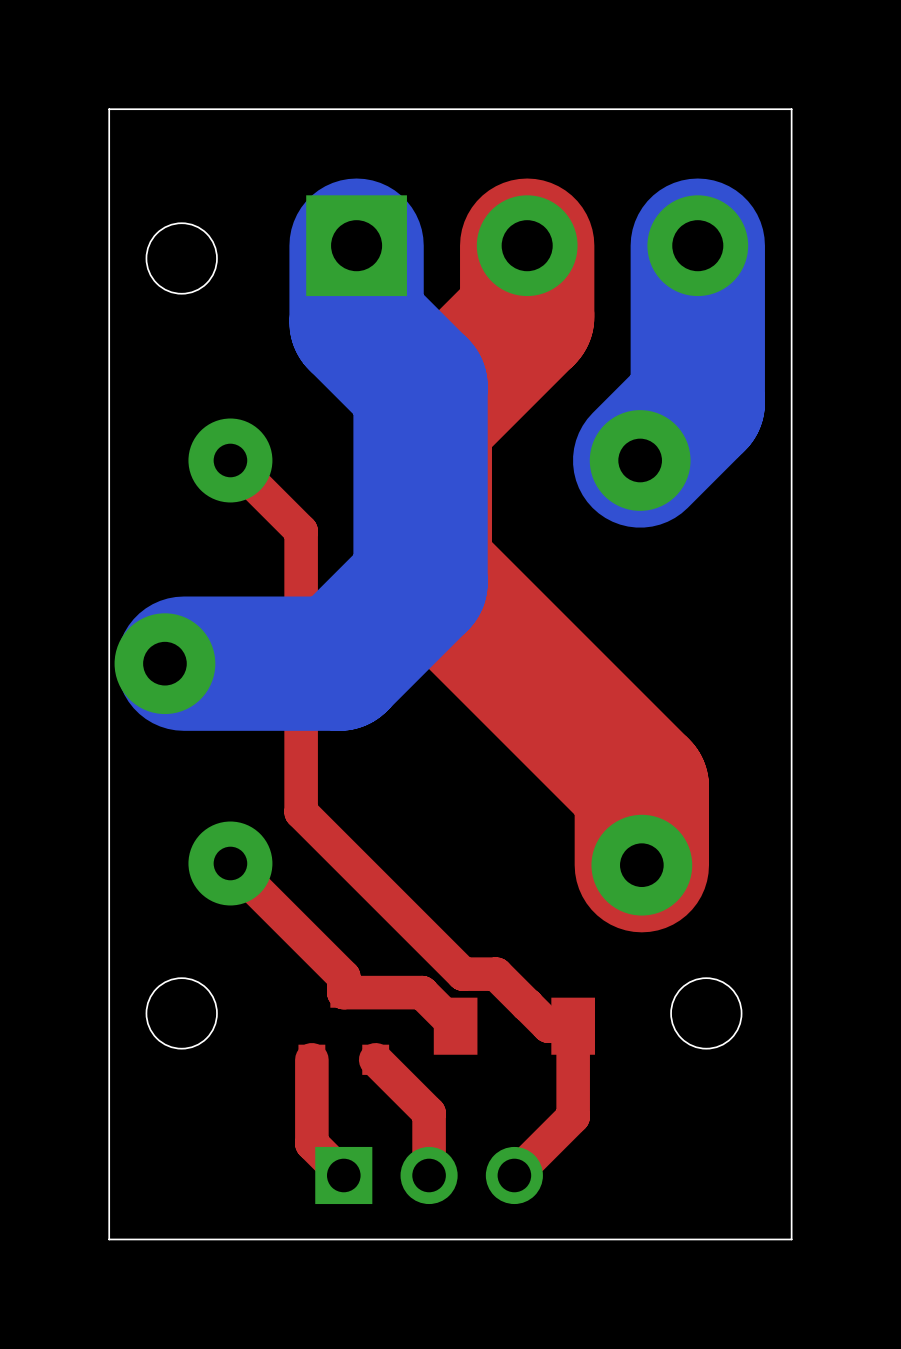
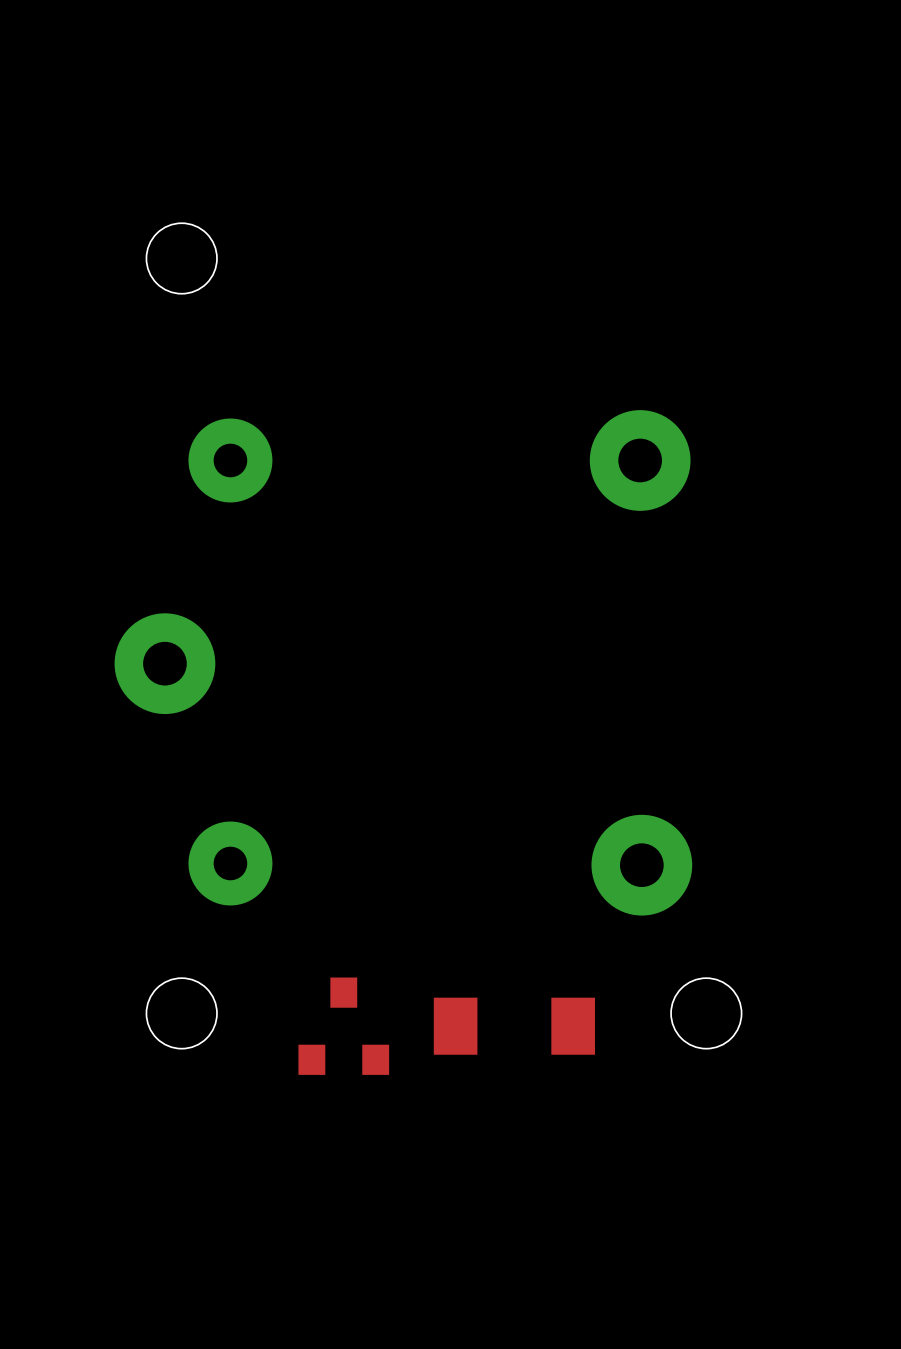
board edge: (791, 109) (109, 109) (109, 1239) (791, 1239) (791, 109) -> none
bottom track: (356, 245) (356, 322) (420, 386) (420, 582) (339, 663) (183, 663) -> none
top track: (527, 245) (527, 316) (424, 419) (424, 569) (641, 786) (641, 865) -> none
part: (527, 245) -> none
bottom track: (697, 245) (697, 402) (640, 460) -> none
top track: (230, 460) (301, 531) (301, 812) (463, 974) (496, 974) (548, 1026) (573, 1026) (573, 1116) (514, 1175) -> none
top track: (230, 863) (343, 976) (343, 992) (422, 992) (455, 1026) -> none
top track: (311, 1059) (311, 1143) (343, 1175) -> none
top track: (375, 1059) (429, 1113) (429, 1175) -> none
part: (429, 1175) -> none

